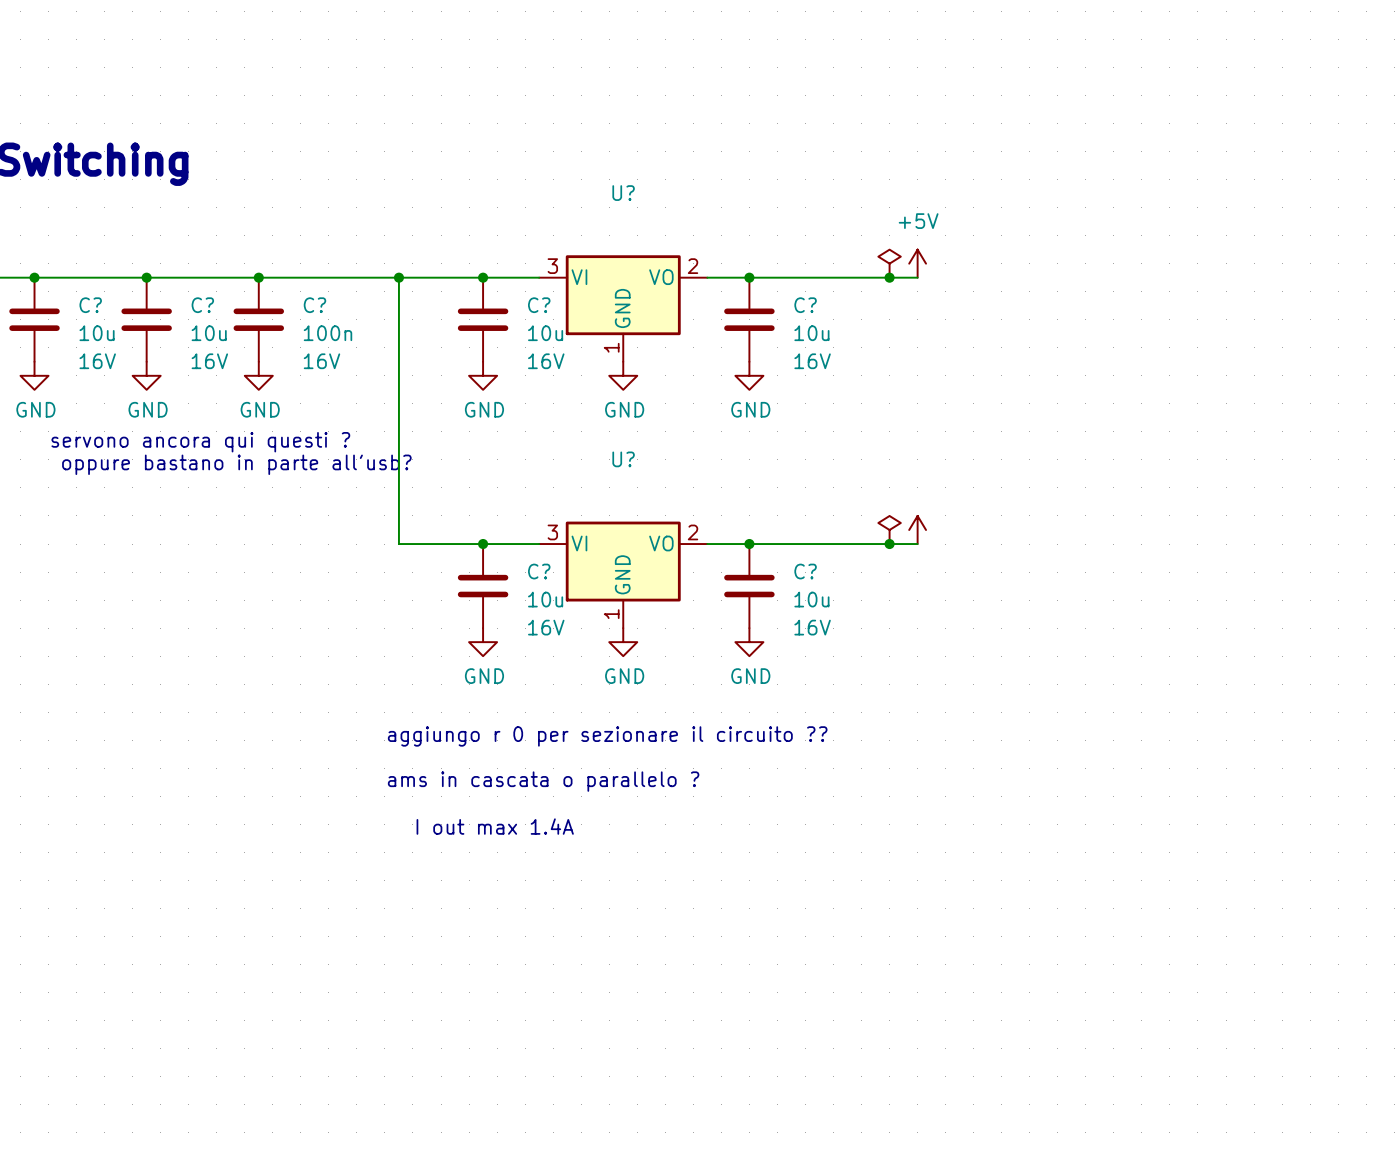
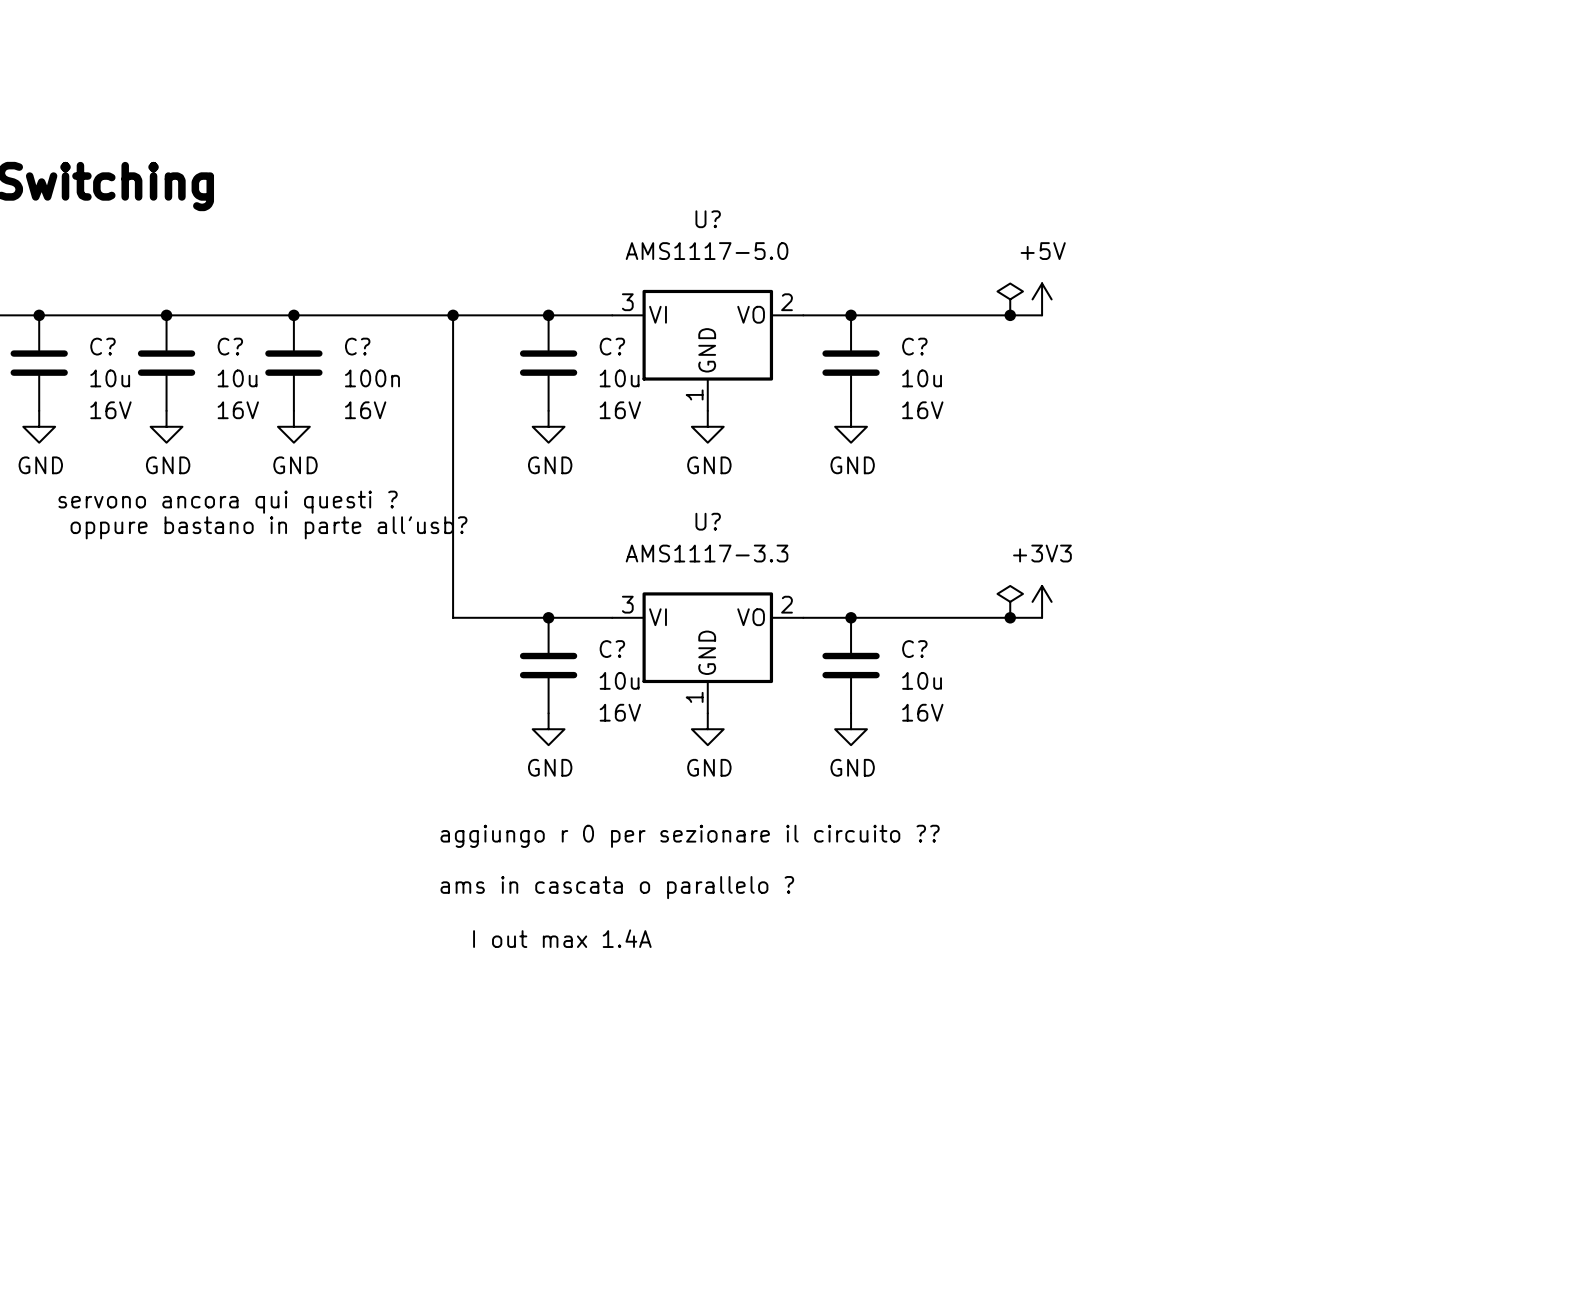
U? value: none -> AMS1117-5.0 (707, 251)
U? value: none -> AMS1117-3.3 (707, 553)
power symbol text: none -> +3V3 (1042, 553)

